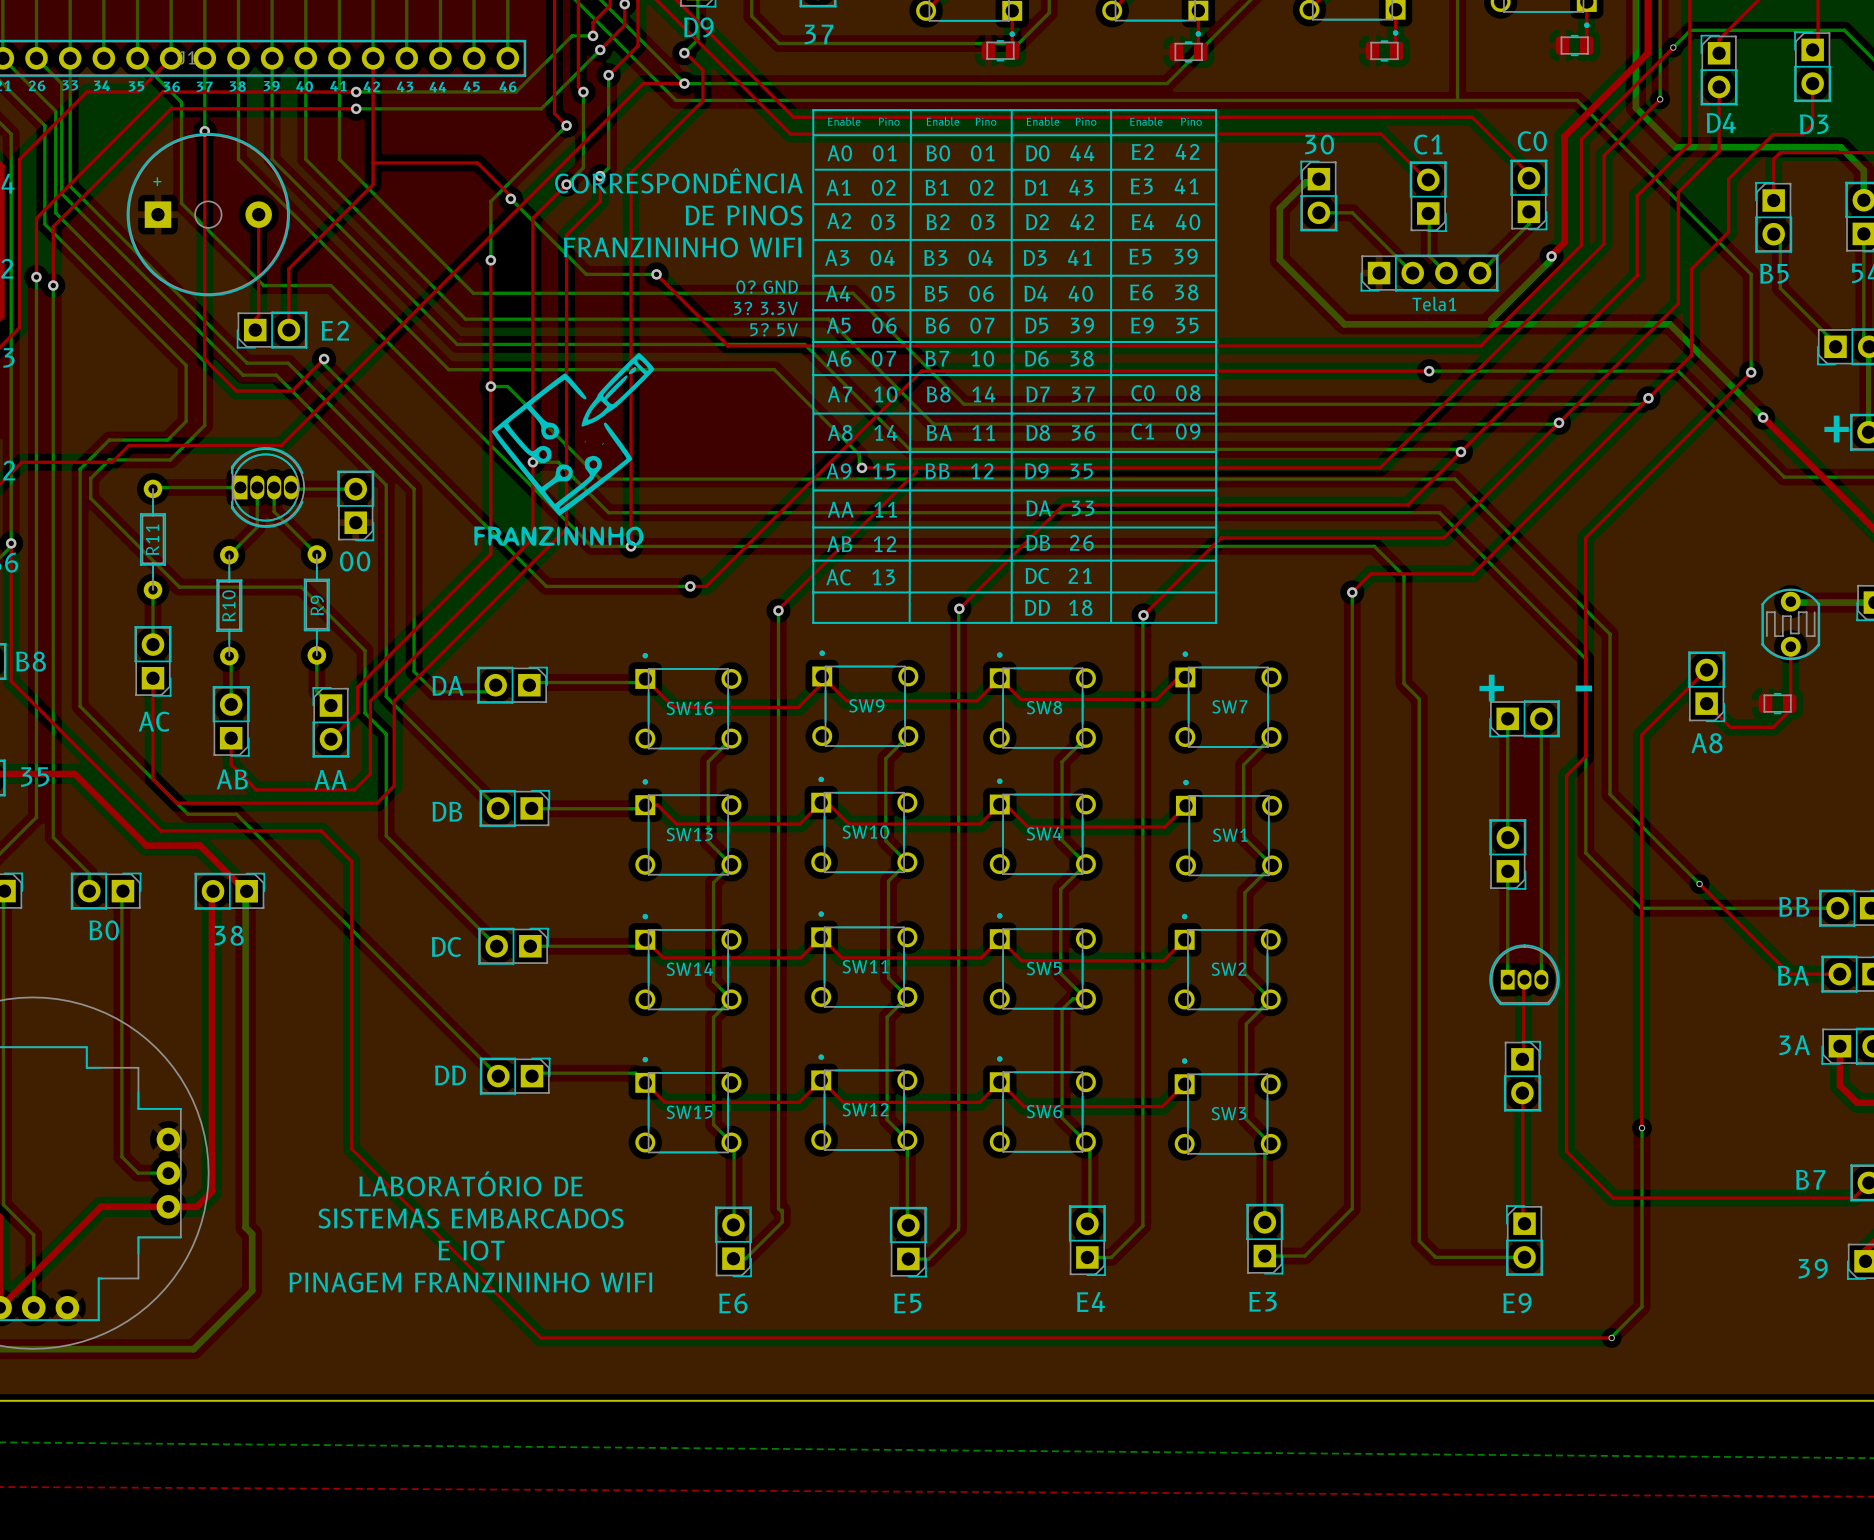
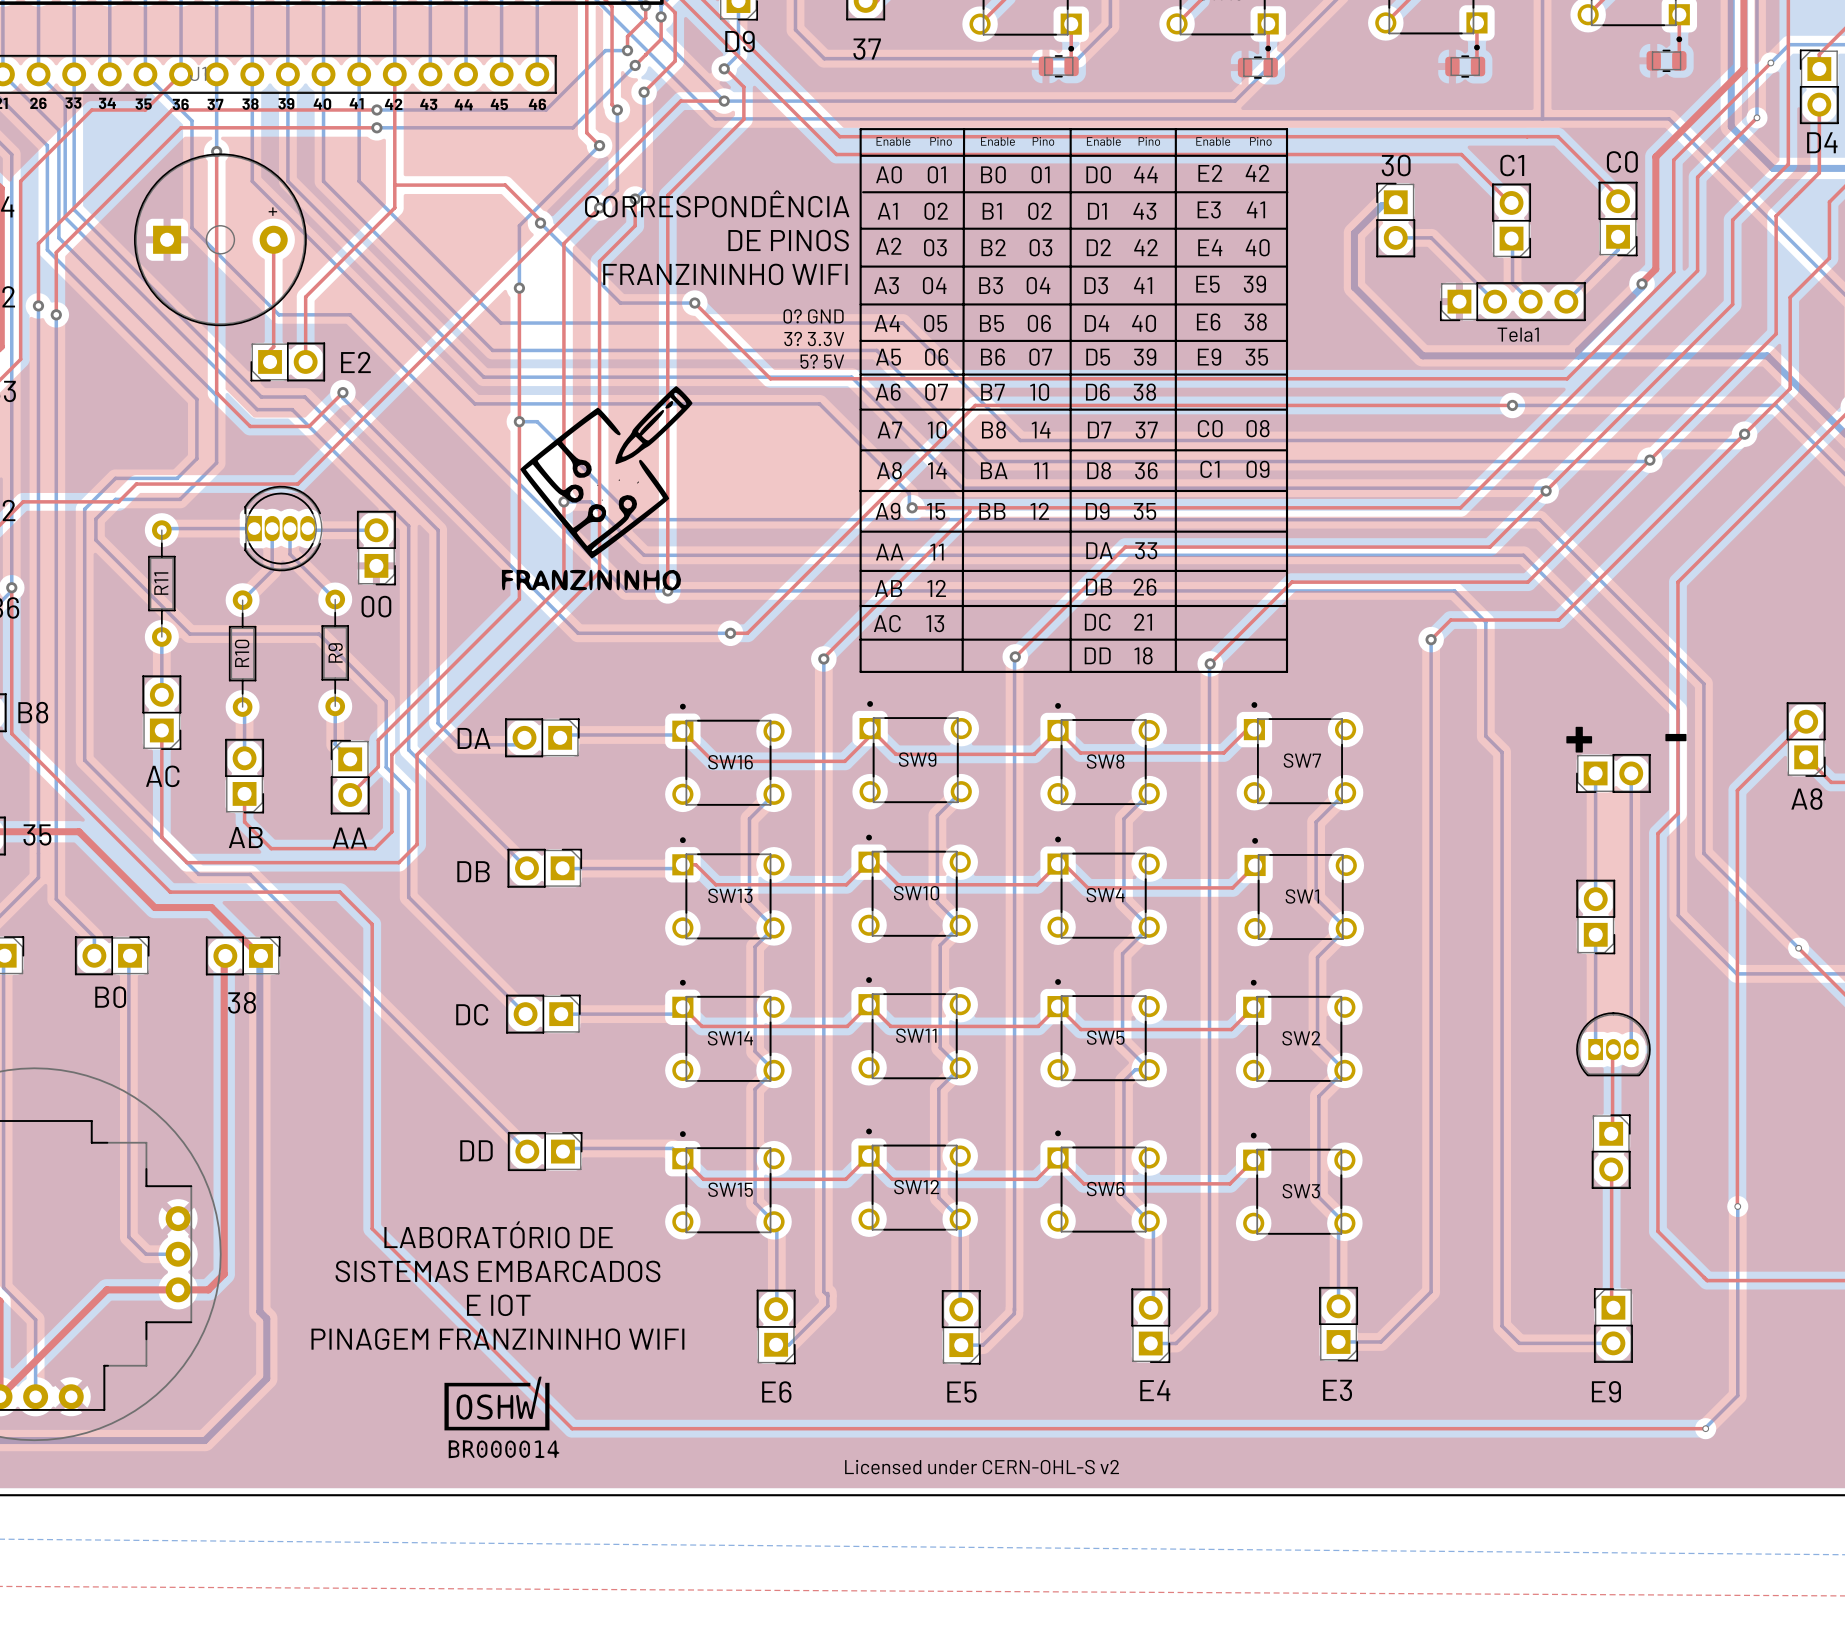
part text position: + (157, 181) -> + (272, 211)
text: none -> LABORATÓRIO DE (498, 1234)
text: LABORATÓRIO DE (471, 1183) -> SISTEMAS EMBARCADOS (498, 1271)
text: SISTEMAS EMBARCADOS (470, 1218) -> E IOT (498, 1305)
text: E IOT (471, 1250) -> PINAGEM FRANZININHO WIFI (497, 1339)
text: PINAGEM FRANZININHO WIFI (470, 1282) -> none
drawing: none -> [444, 1376, 560, 1459]
text: none -> Licensed under CERN-OHL-S v2 (982, 1467)

